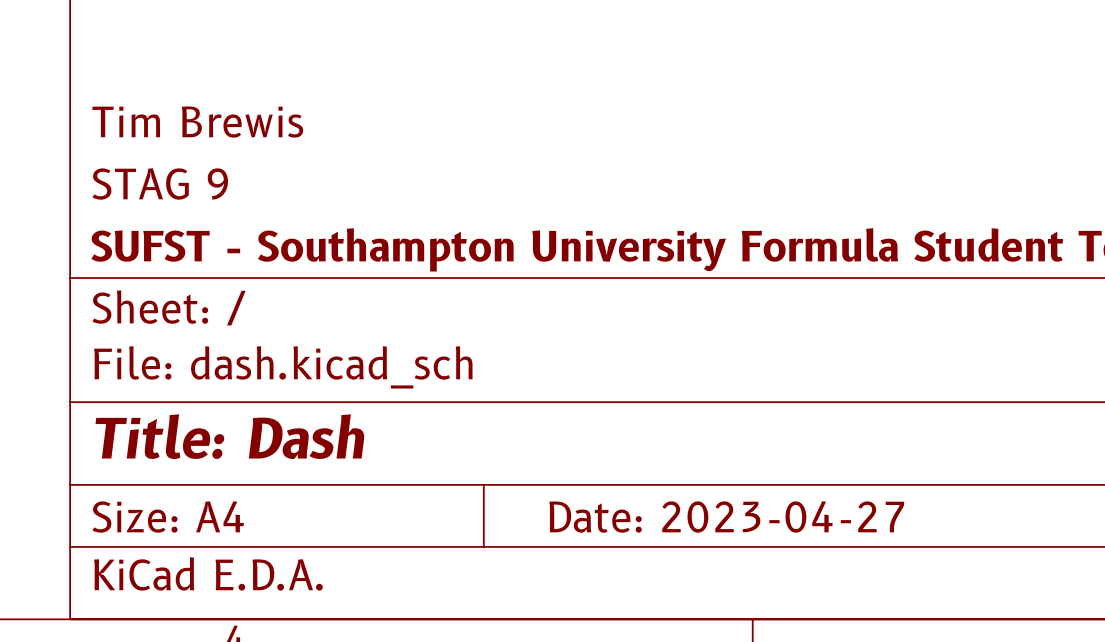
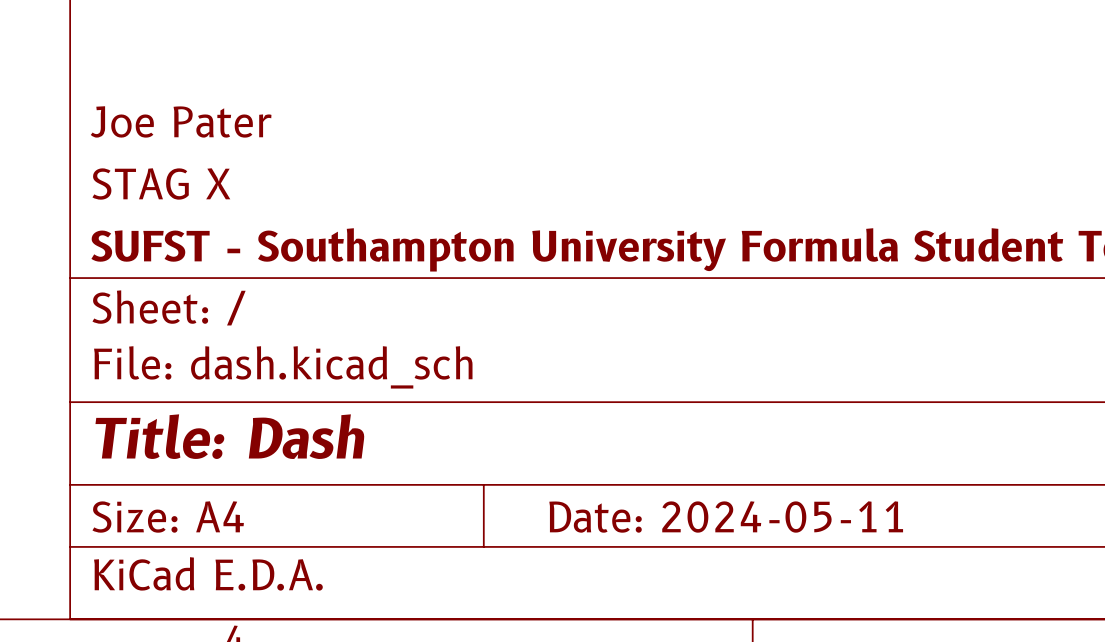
title block: Tim Brewis (197, 122) -> Joe Pater (181, 121)
title block: STAG 9 (160, 183) -> STAG X (161, 183)
title block: Date: 2023-04-27 (726, 516) -> Date: 2024-05-11 (726, 516)

